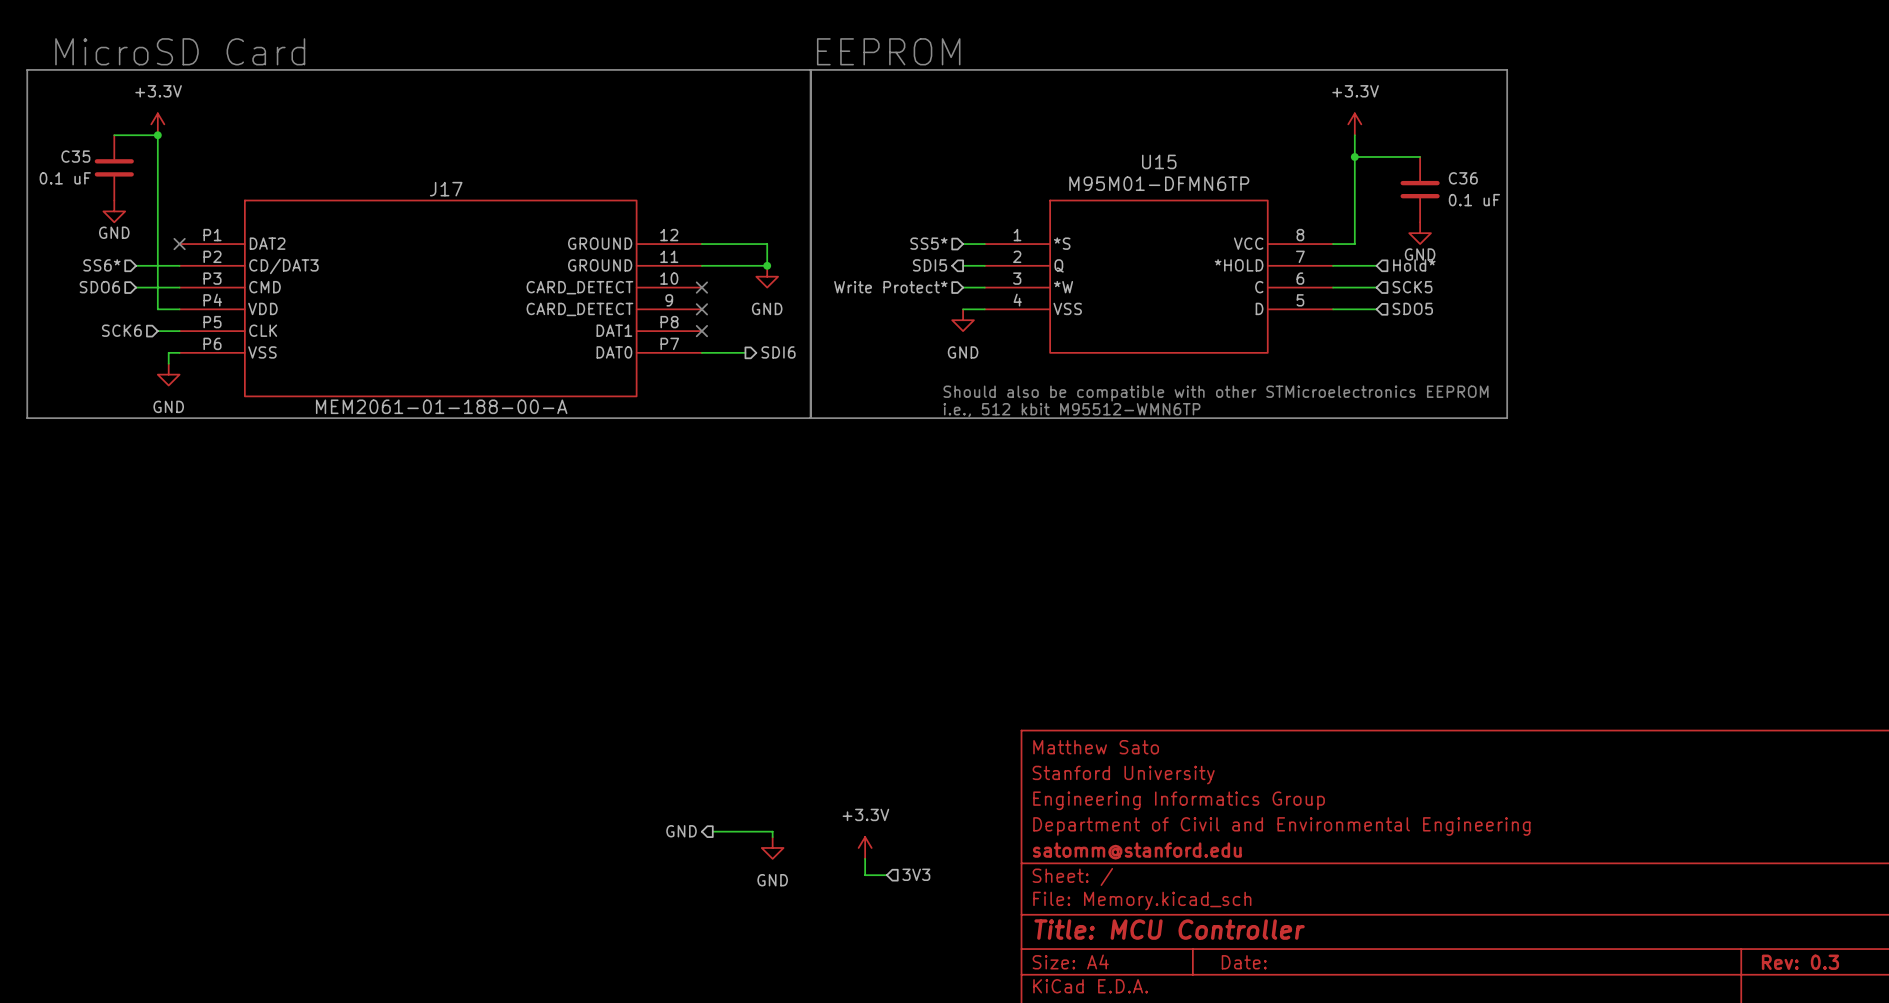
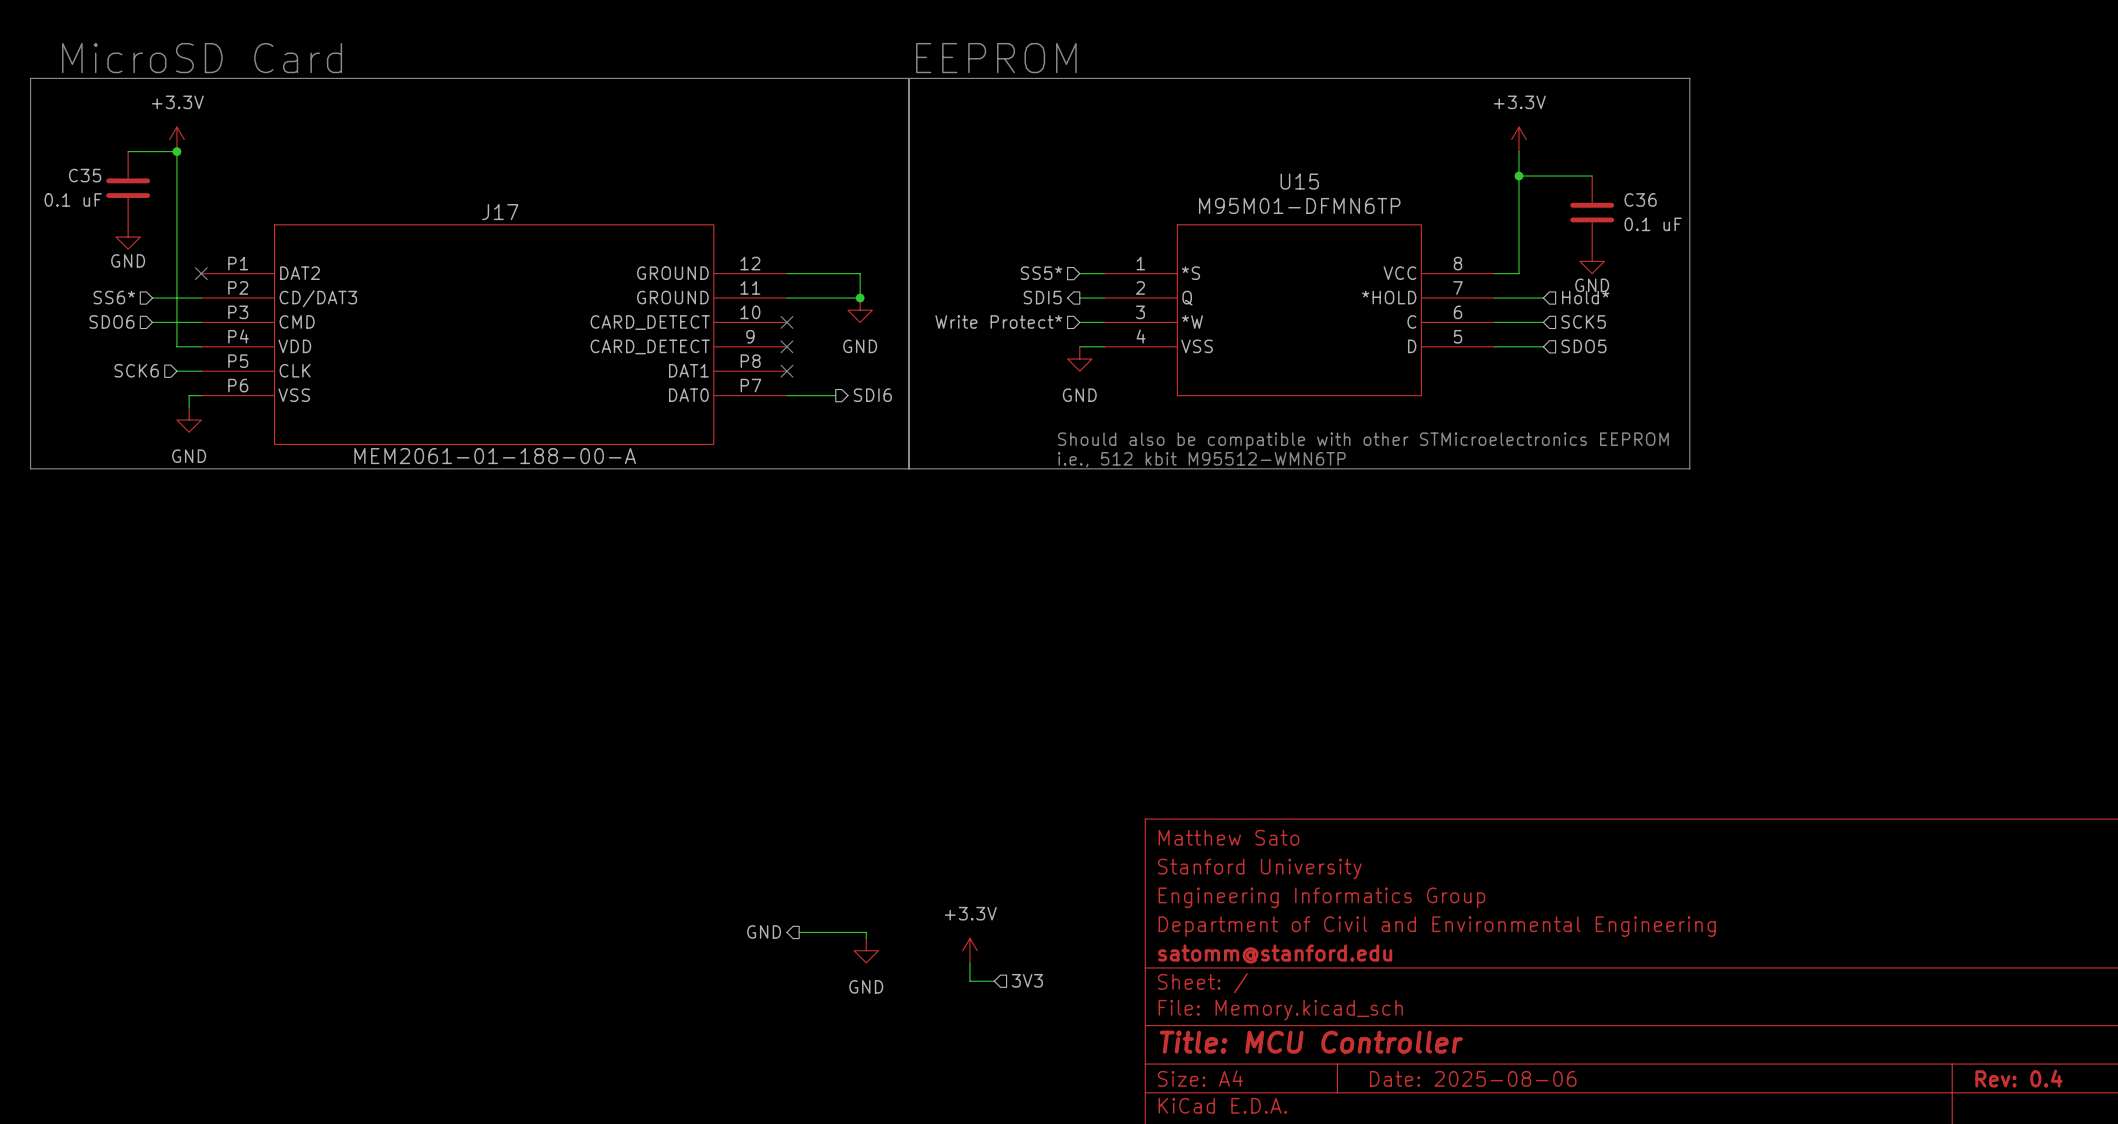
title block: Date: (1244, 962) -> Date: 2025-08-06 (1473, 1078)
title block: Rev: 0.3 (1800, 962) -> Rev: 0.4 (2018, 1078)

